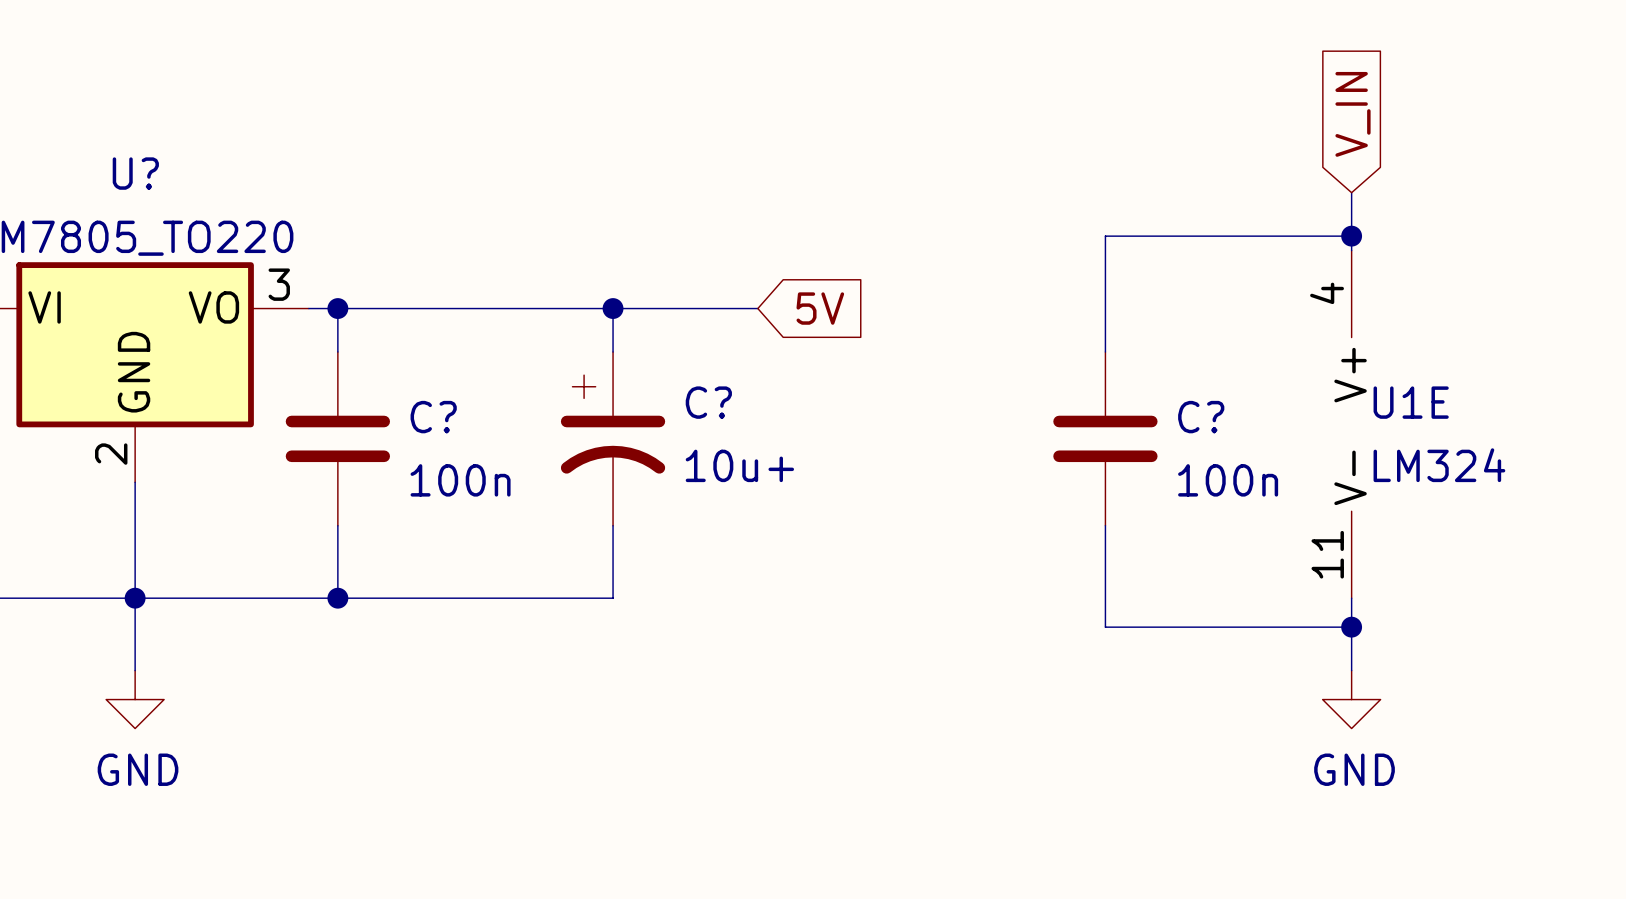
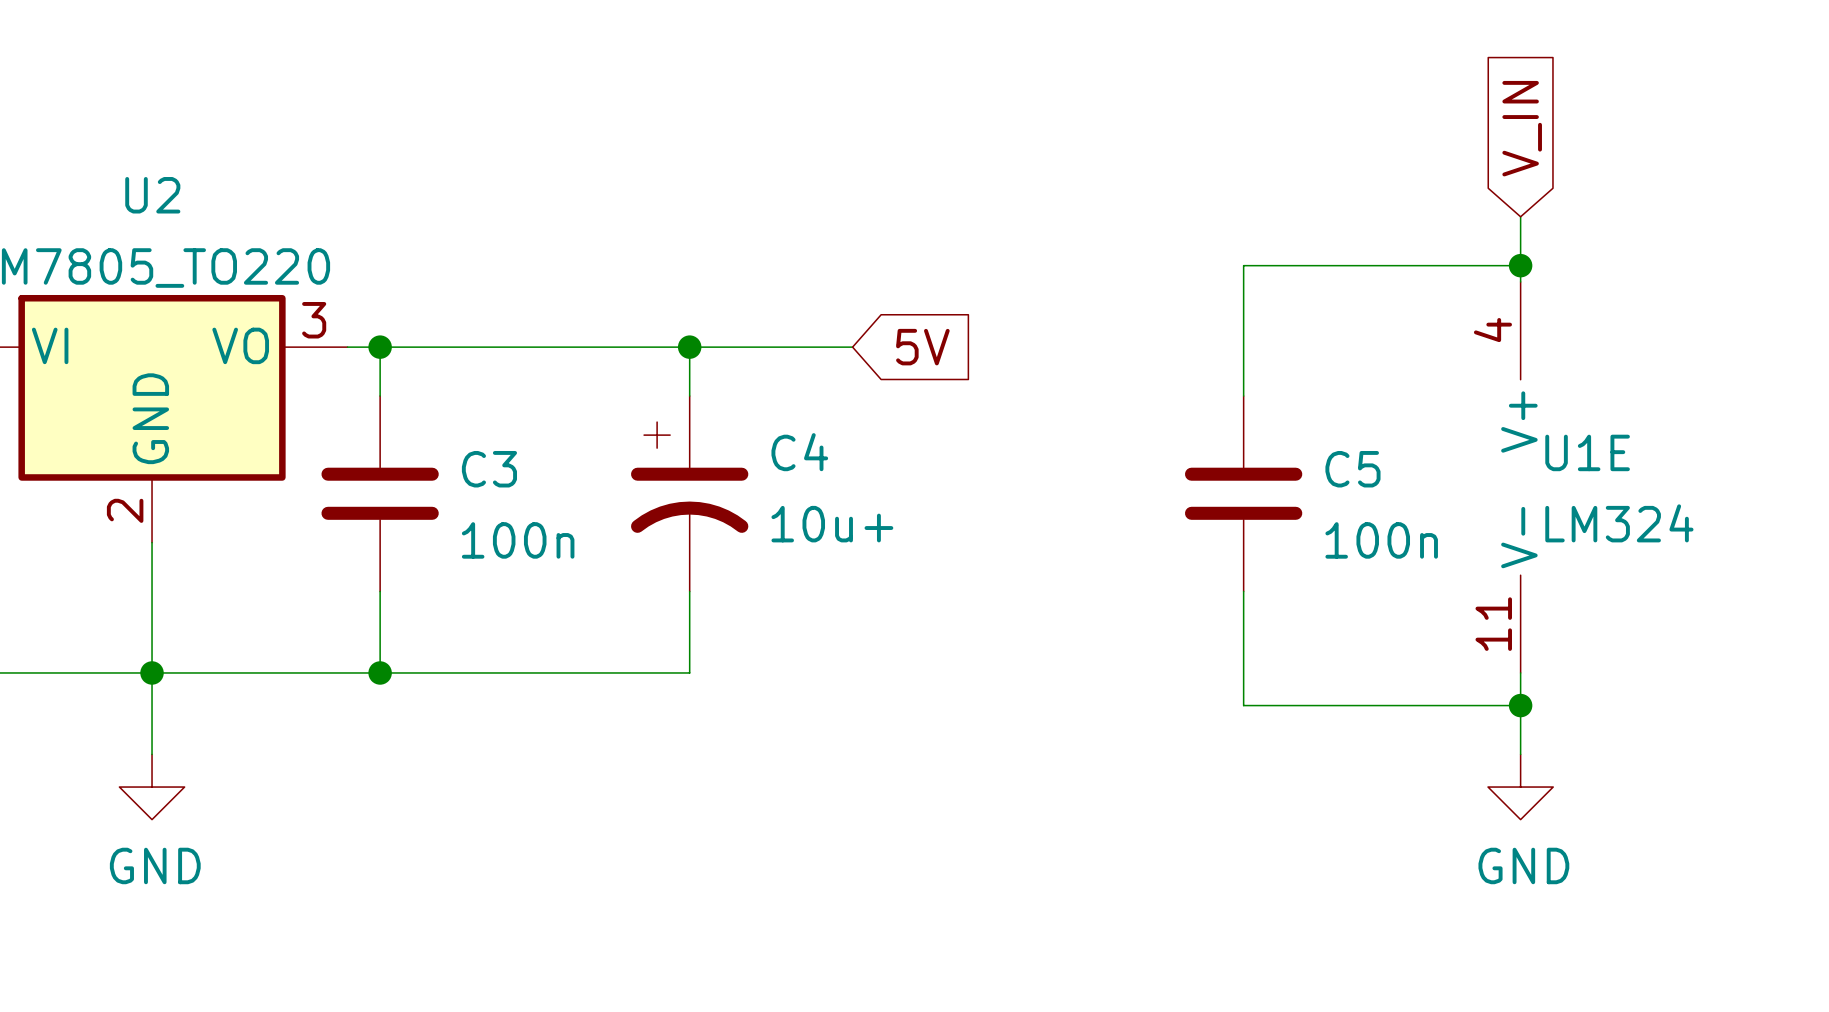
U? name: U? (135, 173) -> U2 (152, 195)
C? name: C? (708, 402) -> C4 (799, 452)
C? name: C? (433, 417) -> C3 (489, 469)
C? name: C? (1201, 417) -> C5 (1352, 469)

